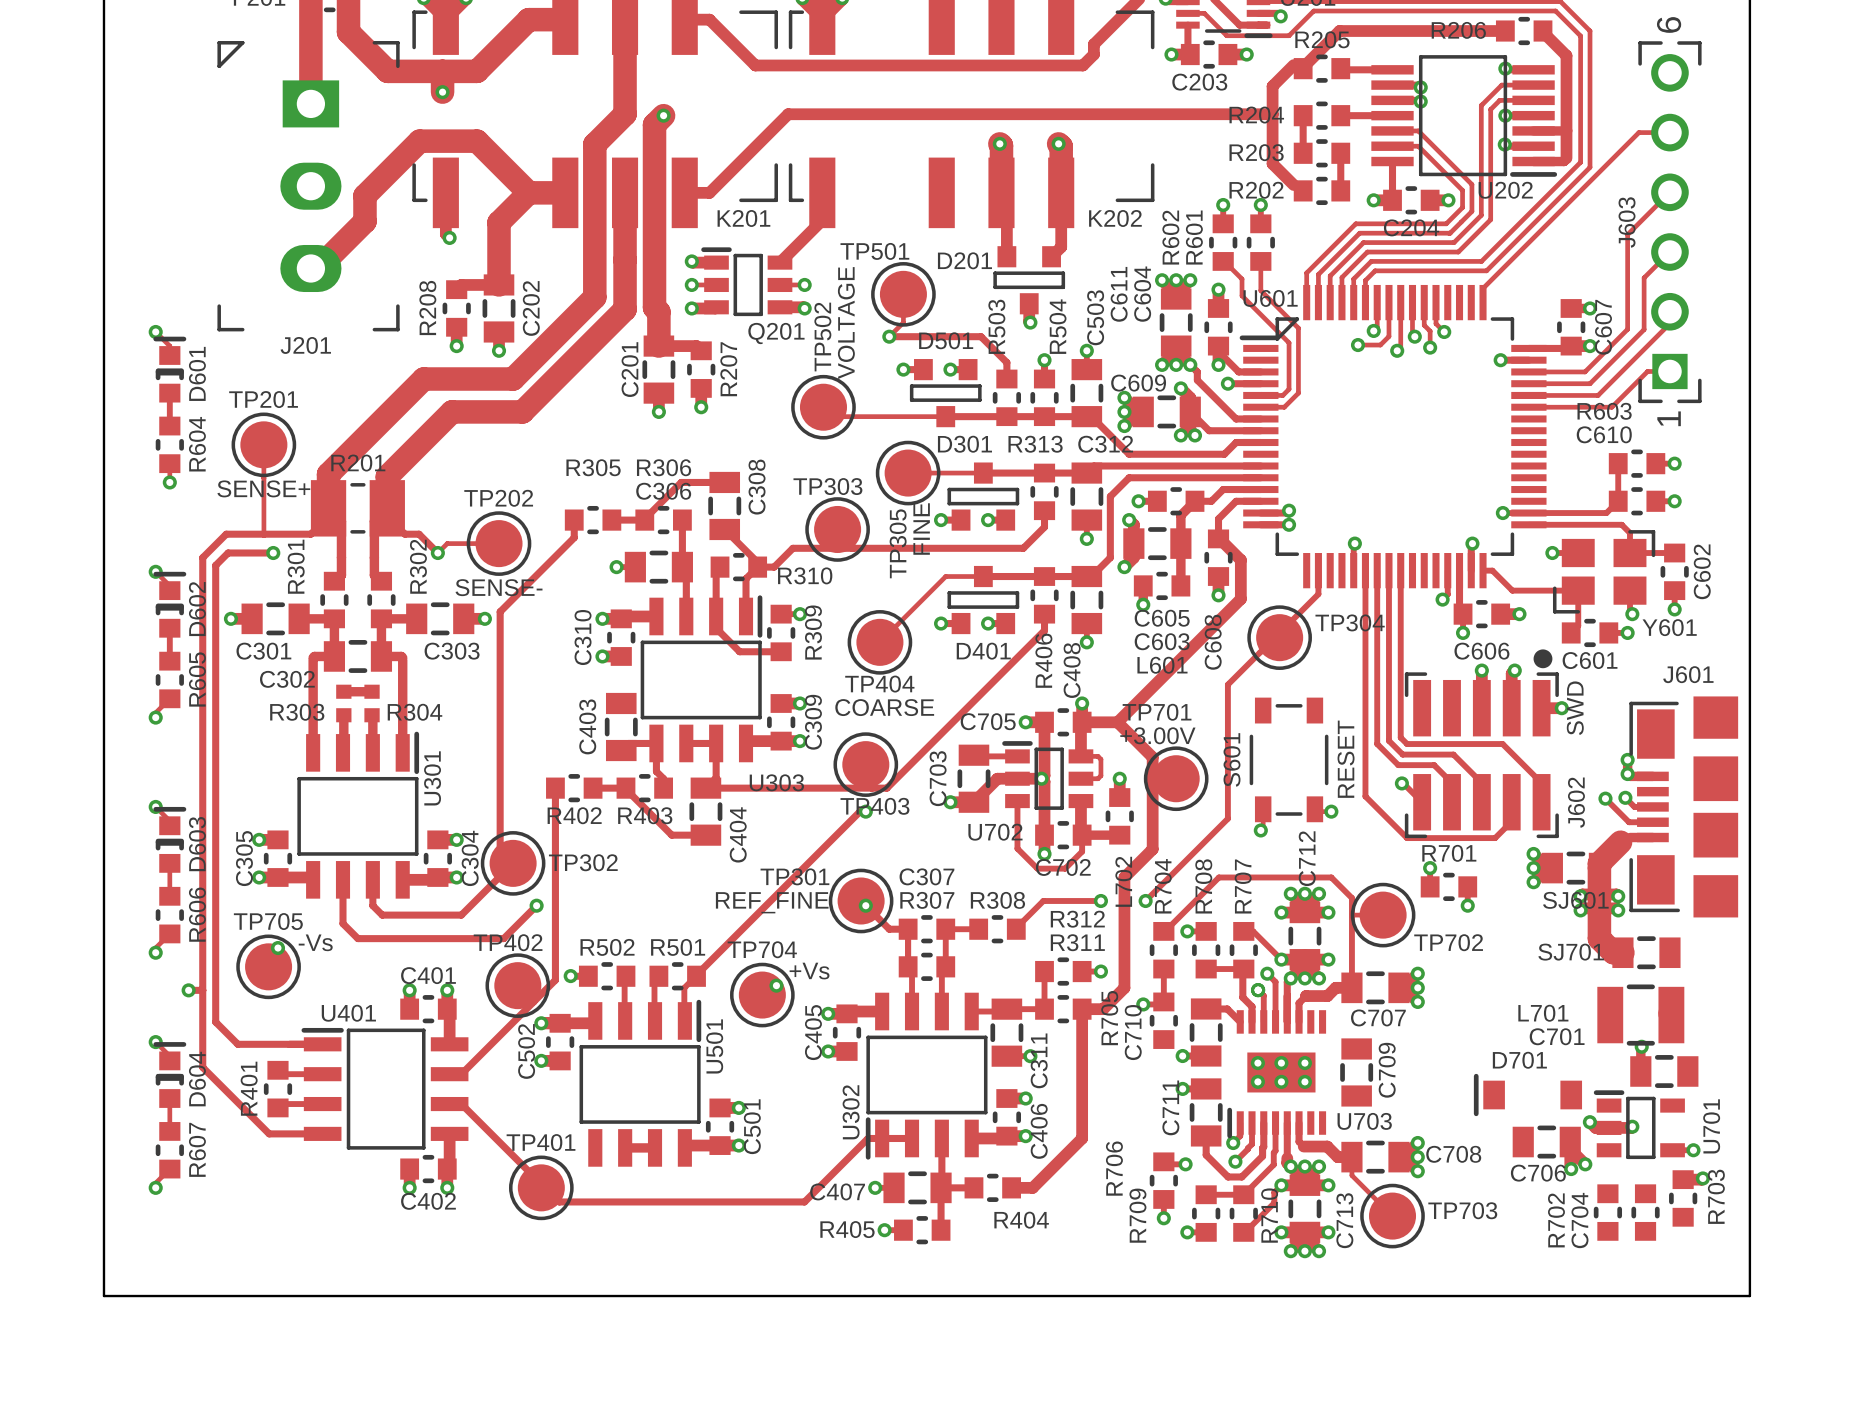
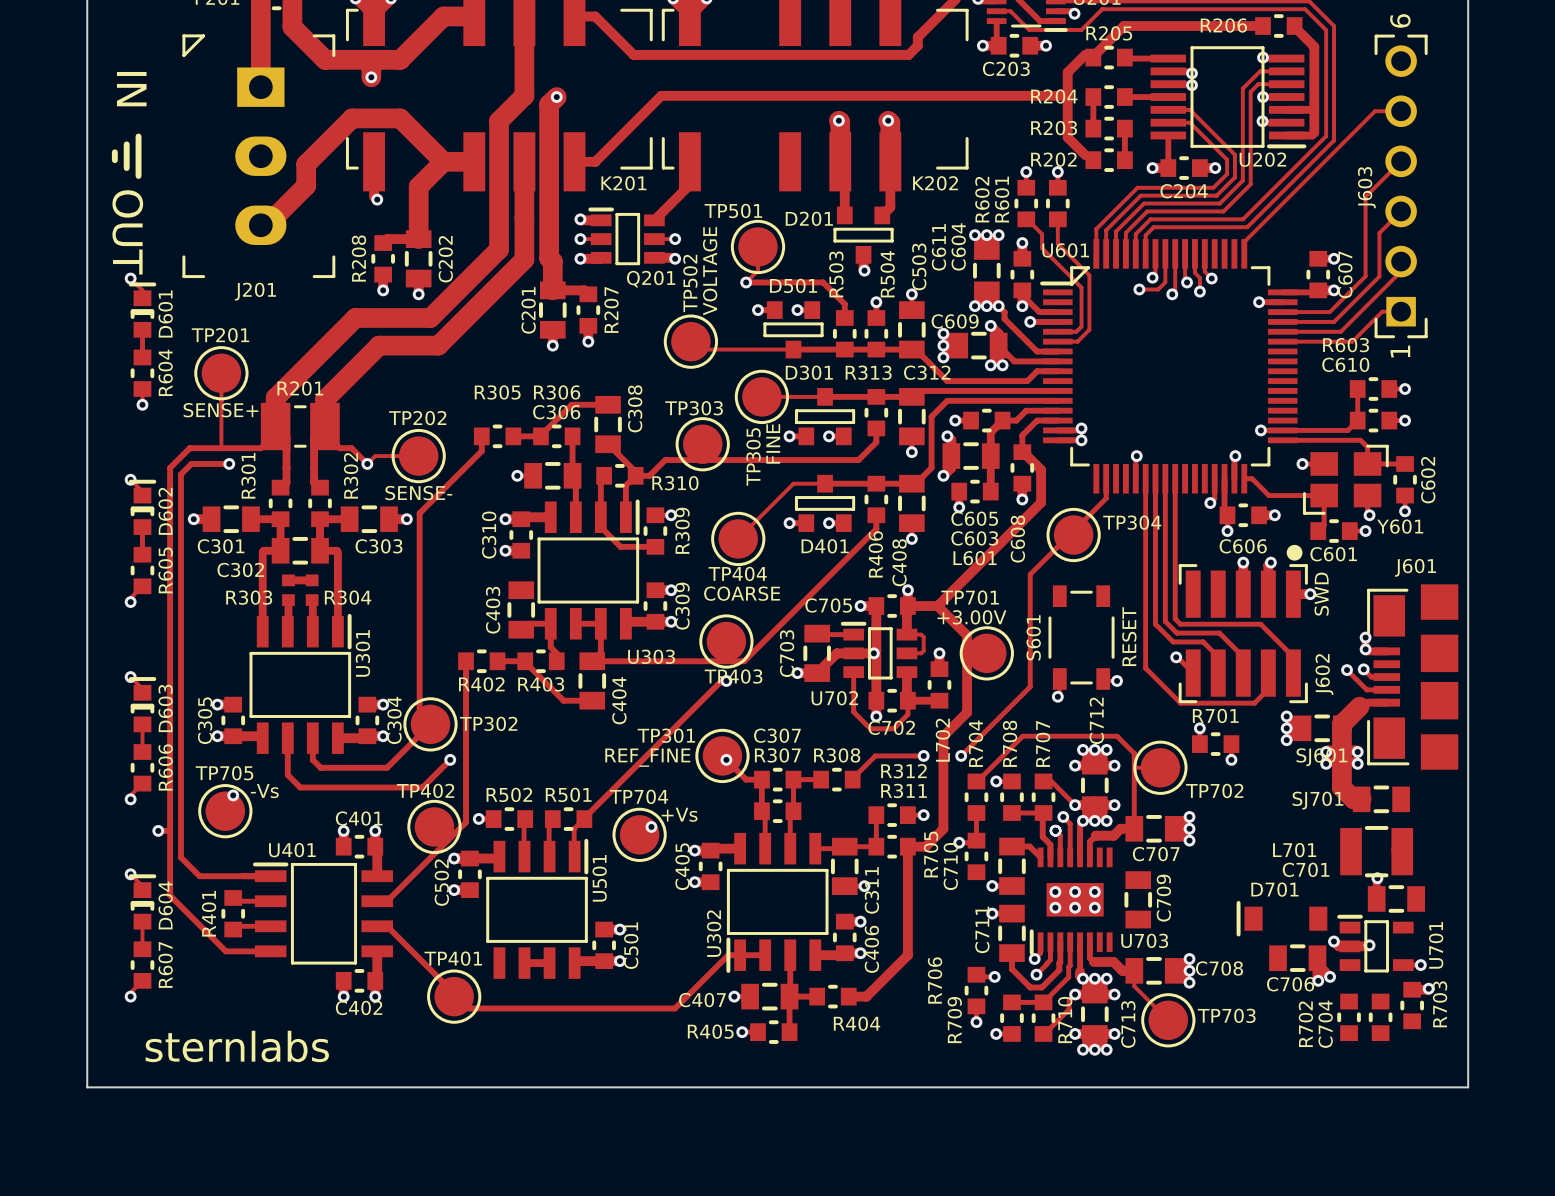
text: none -> IN (131, 89)
line: none -> (138, 136) (138, 175)
line: none -> (126, 144) (126, 168)
line: none -> (114, 152) (114, 160)
text: none -> OUT (127, 232)
text: none -> sternlabs (237, 1046)

